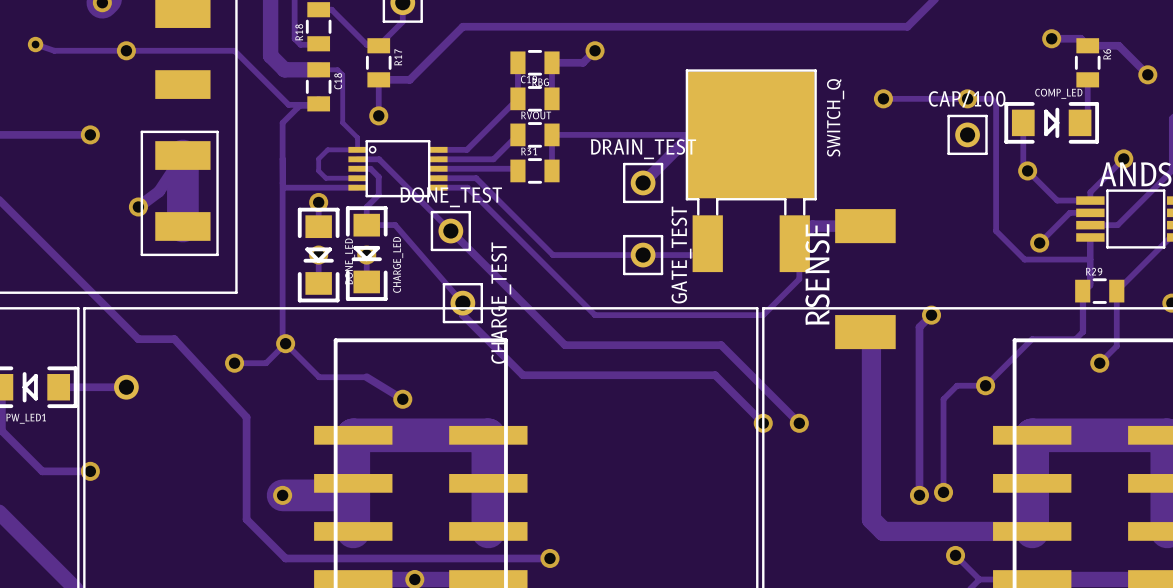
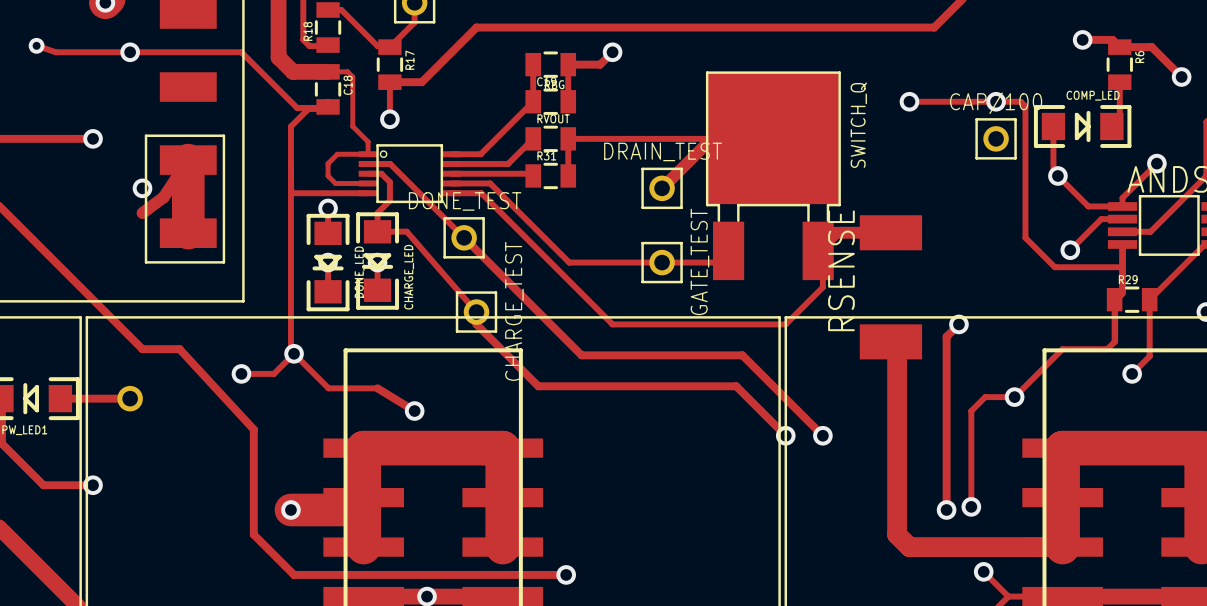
via position: (138, 206) -> (142, 188)

